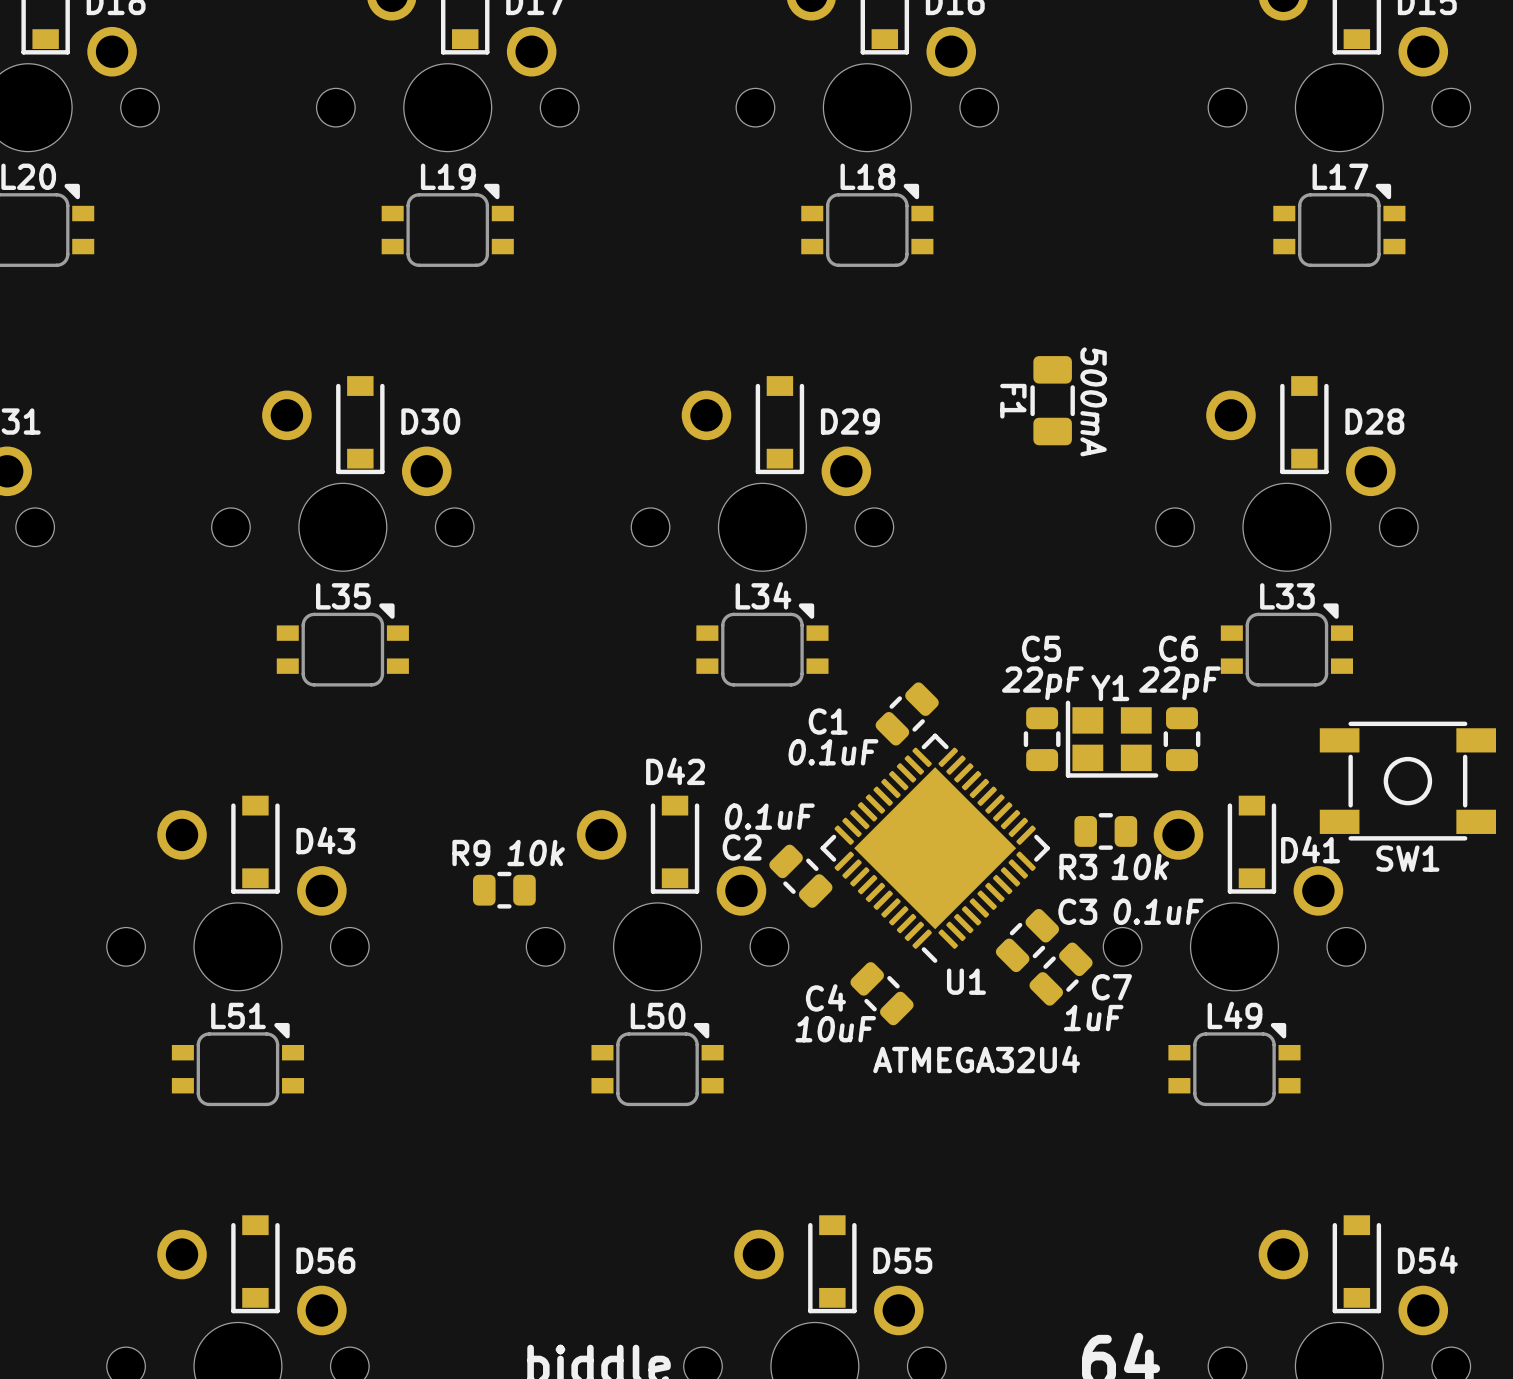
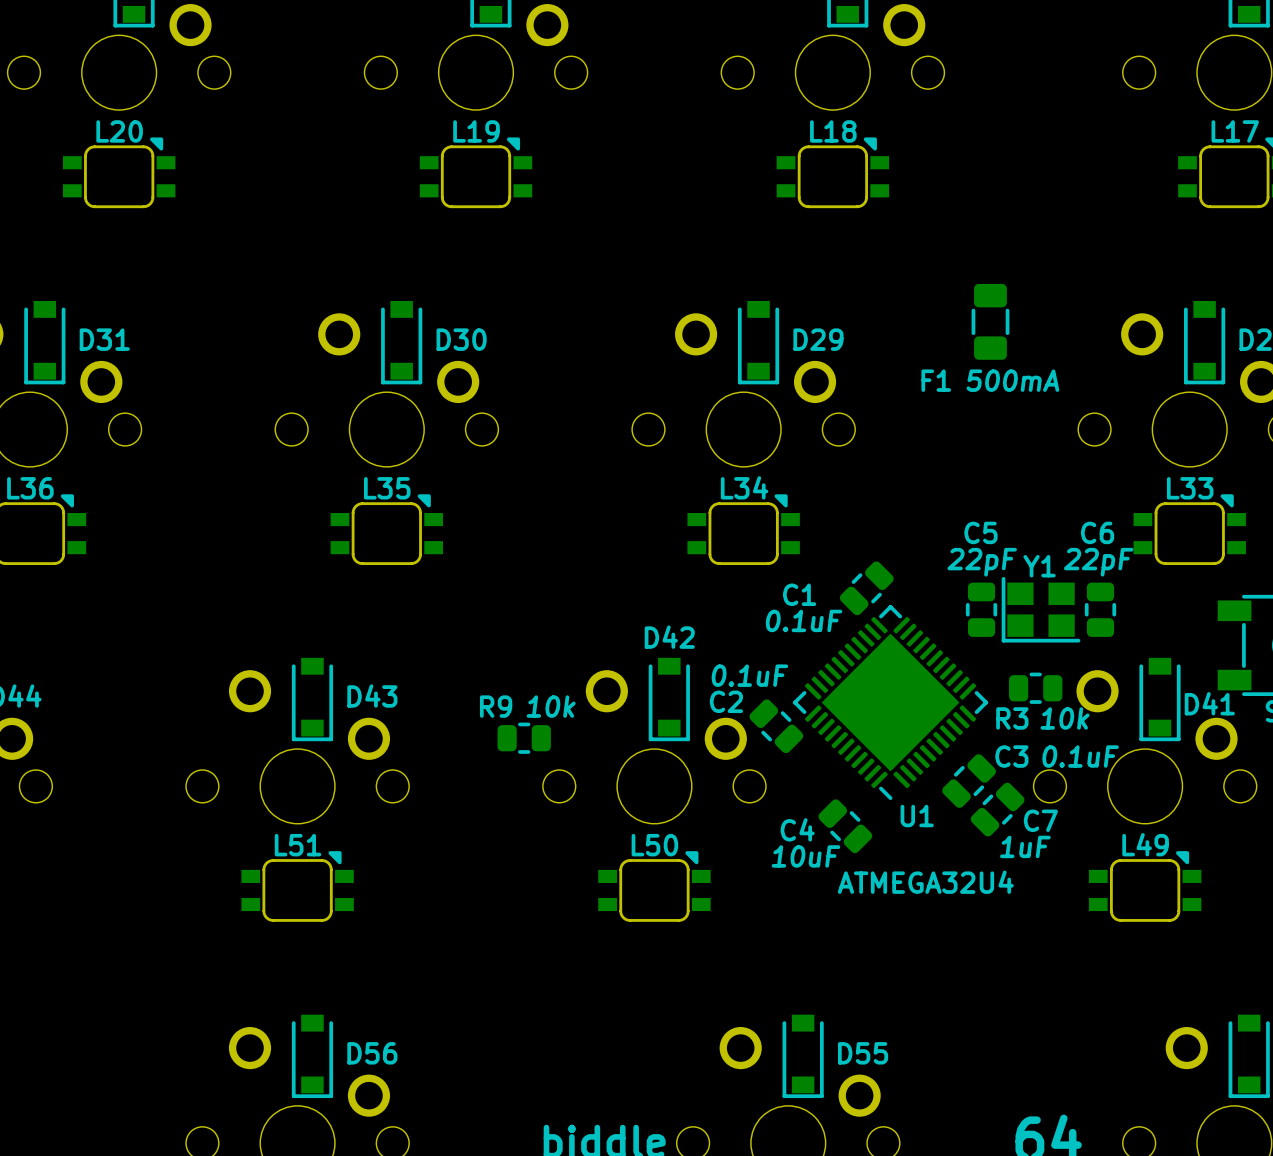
F1 name rotation: 0° (1013, 401) -> 90° counterclockwise (936, 380)
F1 name position: F1 (1013, 401) -> F1 (936, 380)
F1 value rotation: 0° (1093, 401) -> 90° counterclockwise (1012, 380)

